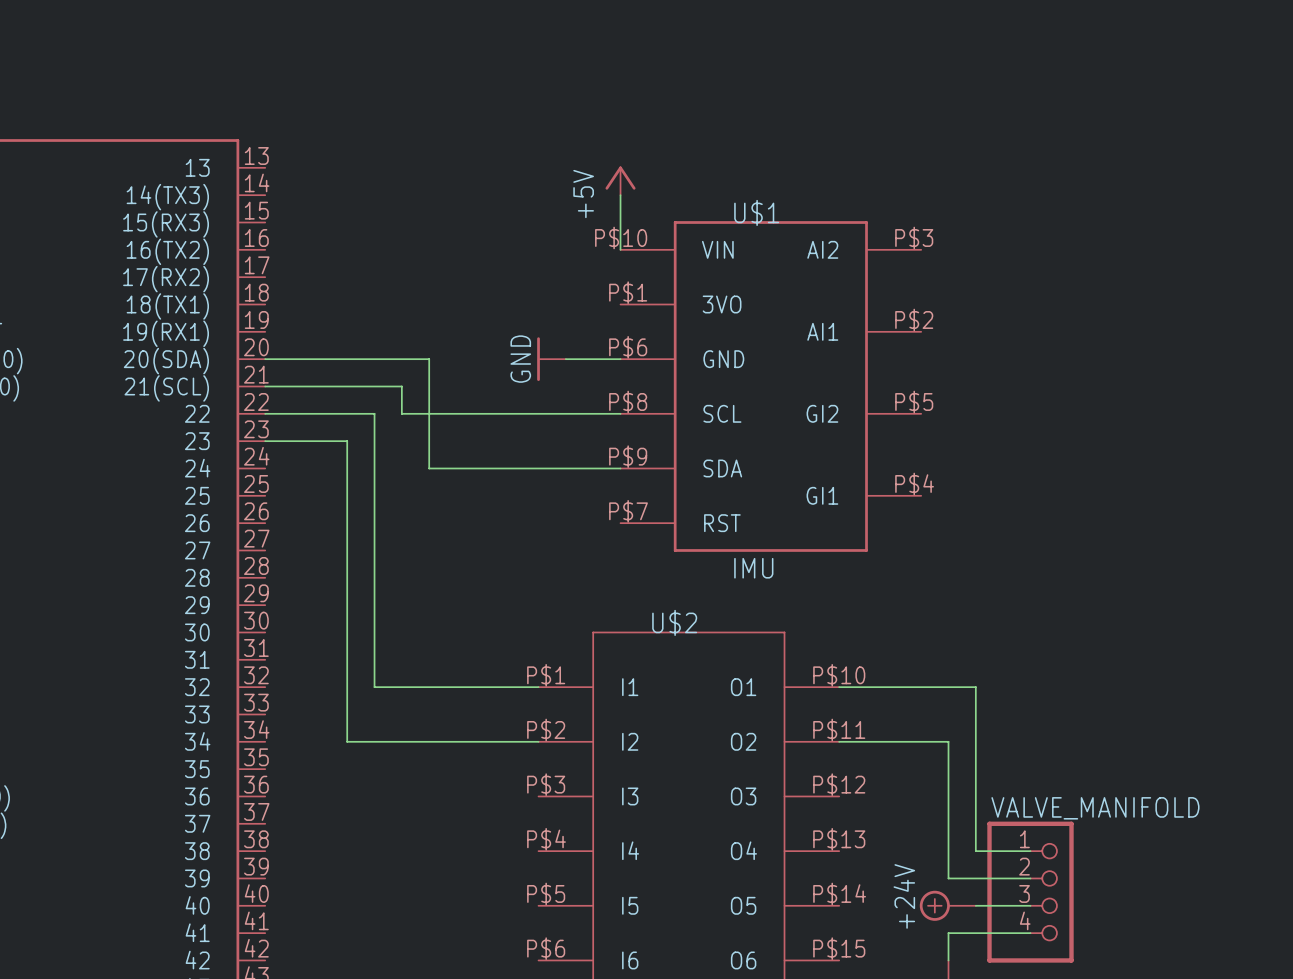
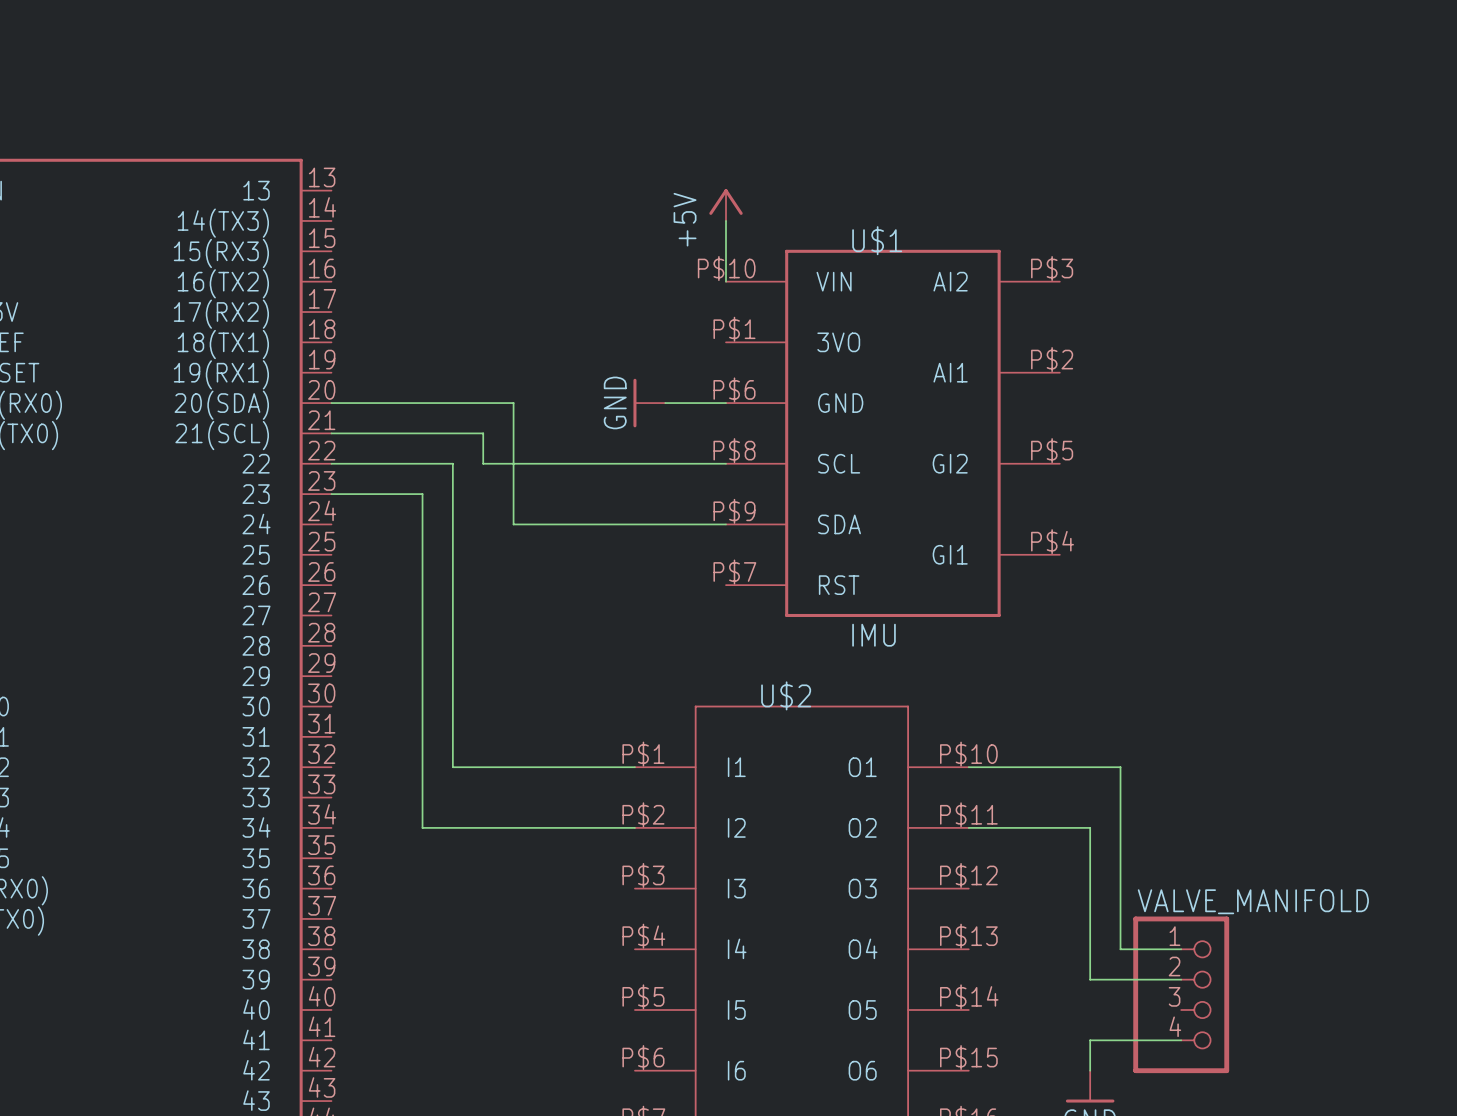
power symbol: +24V (947, 905) -> none
wire: (975, 905) (1030, 905) -> none

